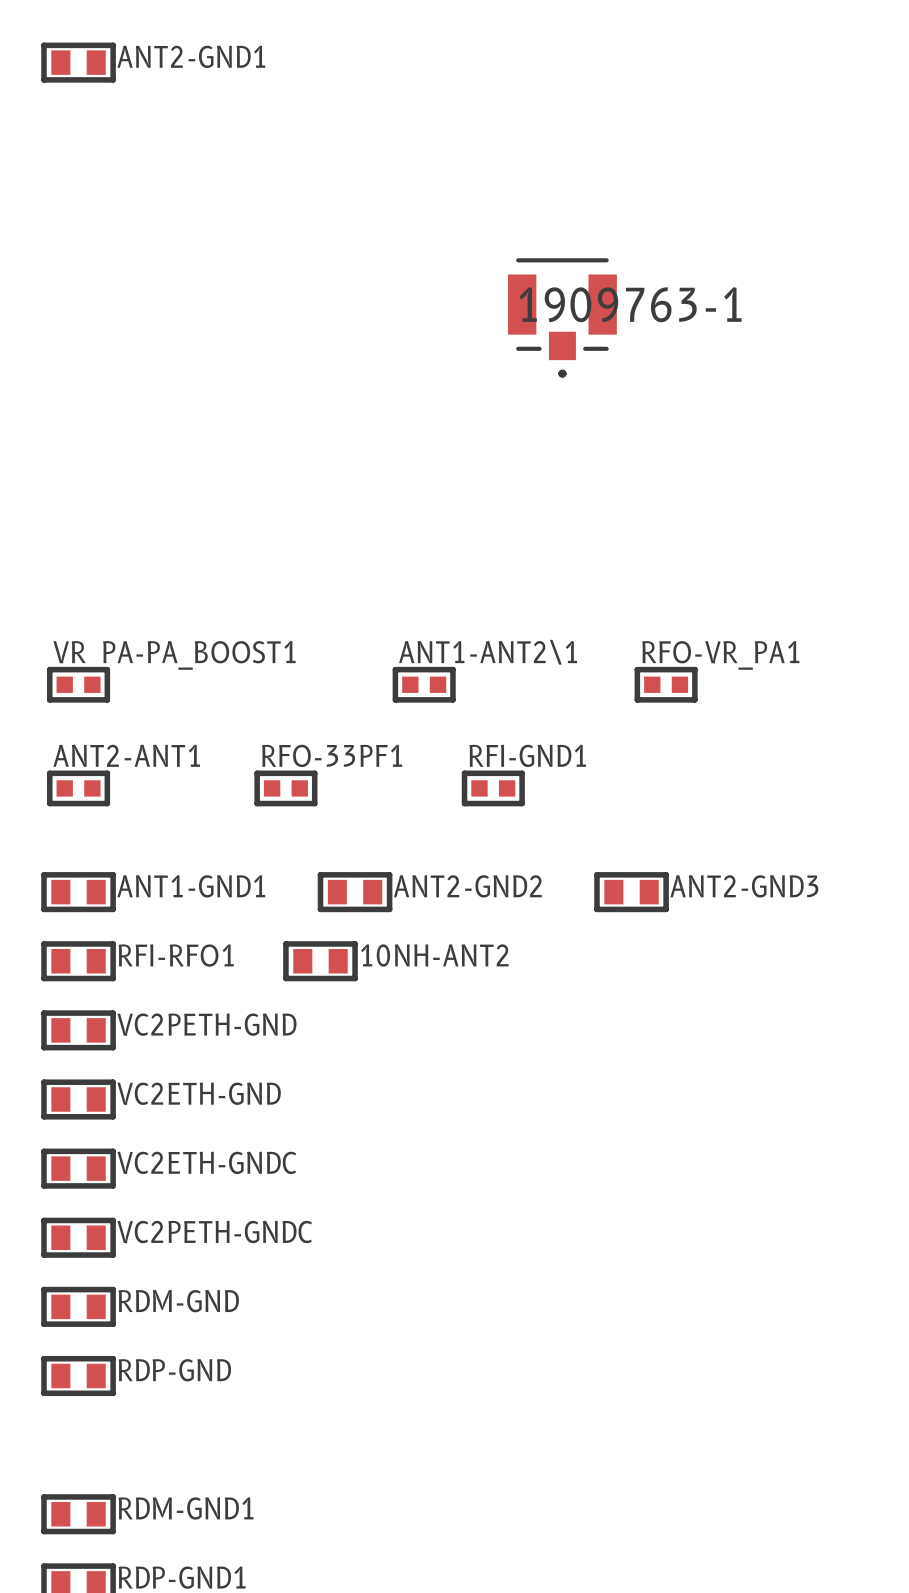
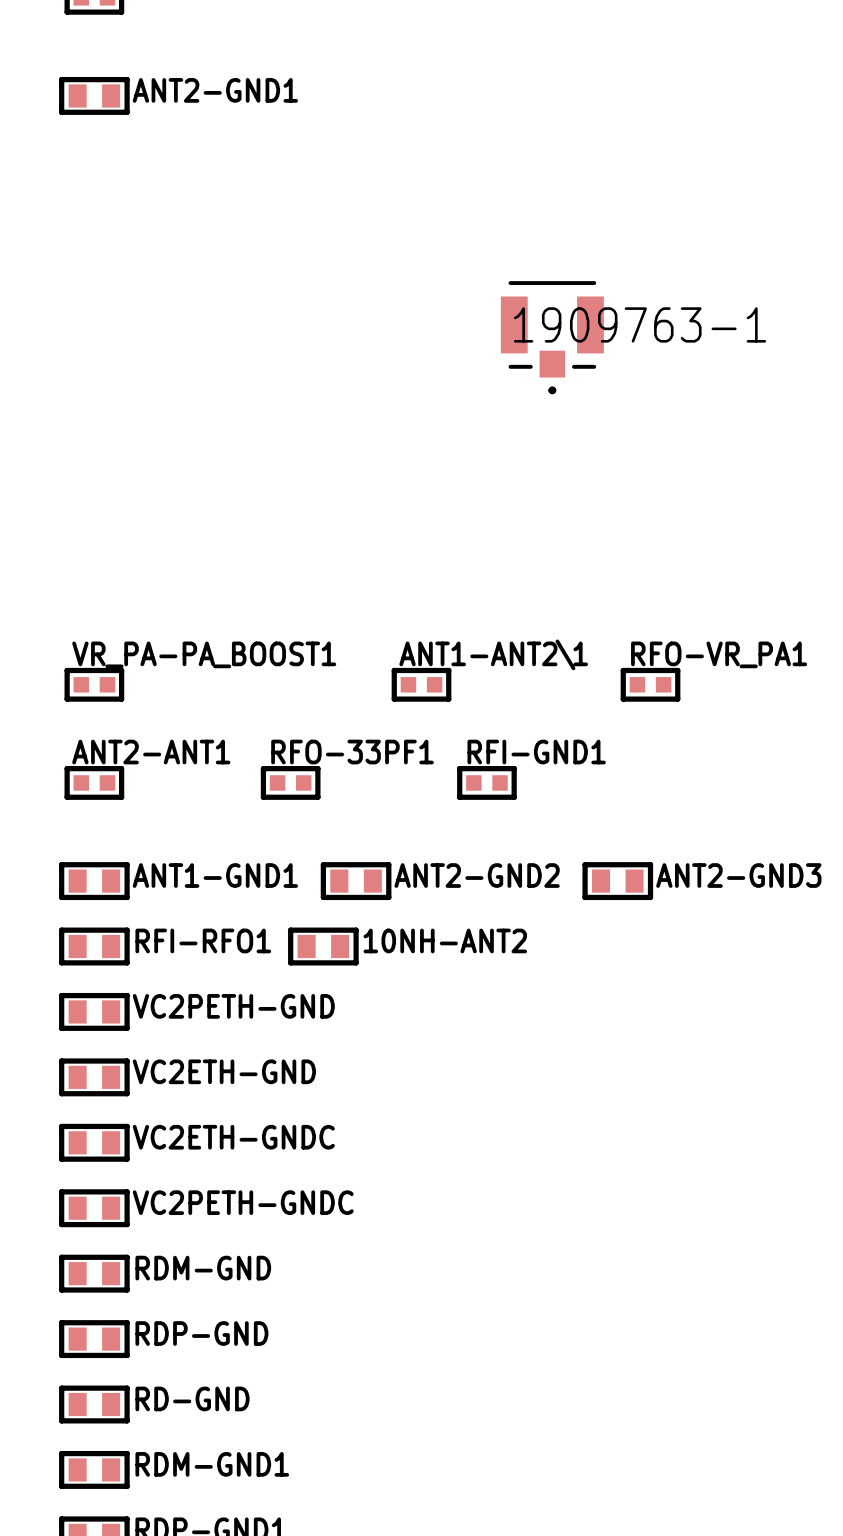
RD-GND: none -> (94, 1404)

